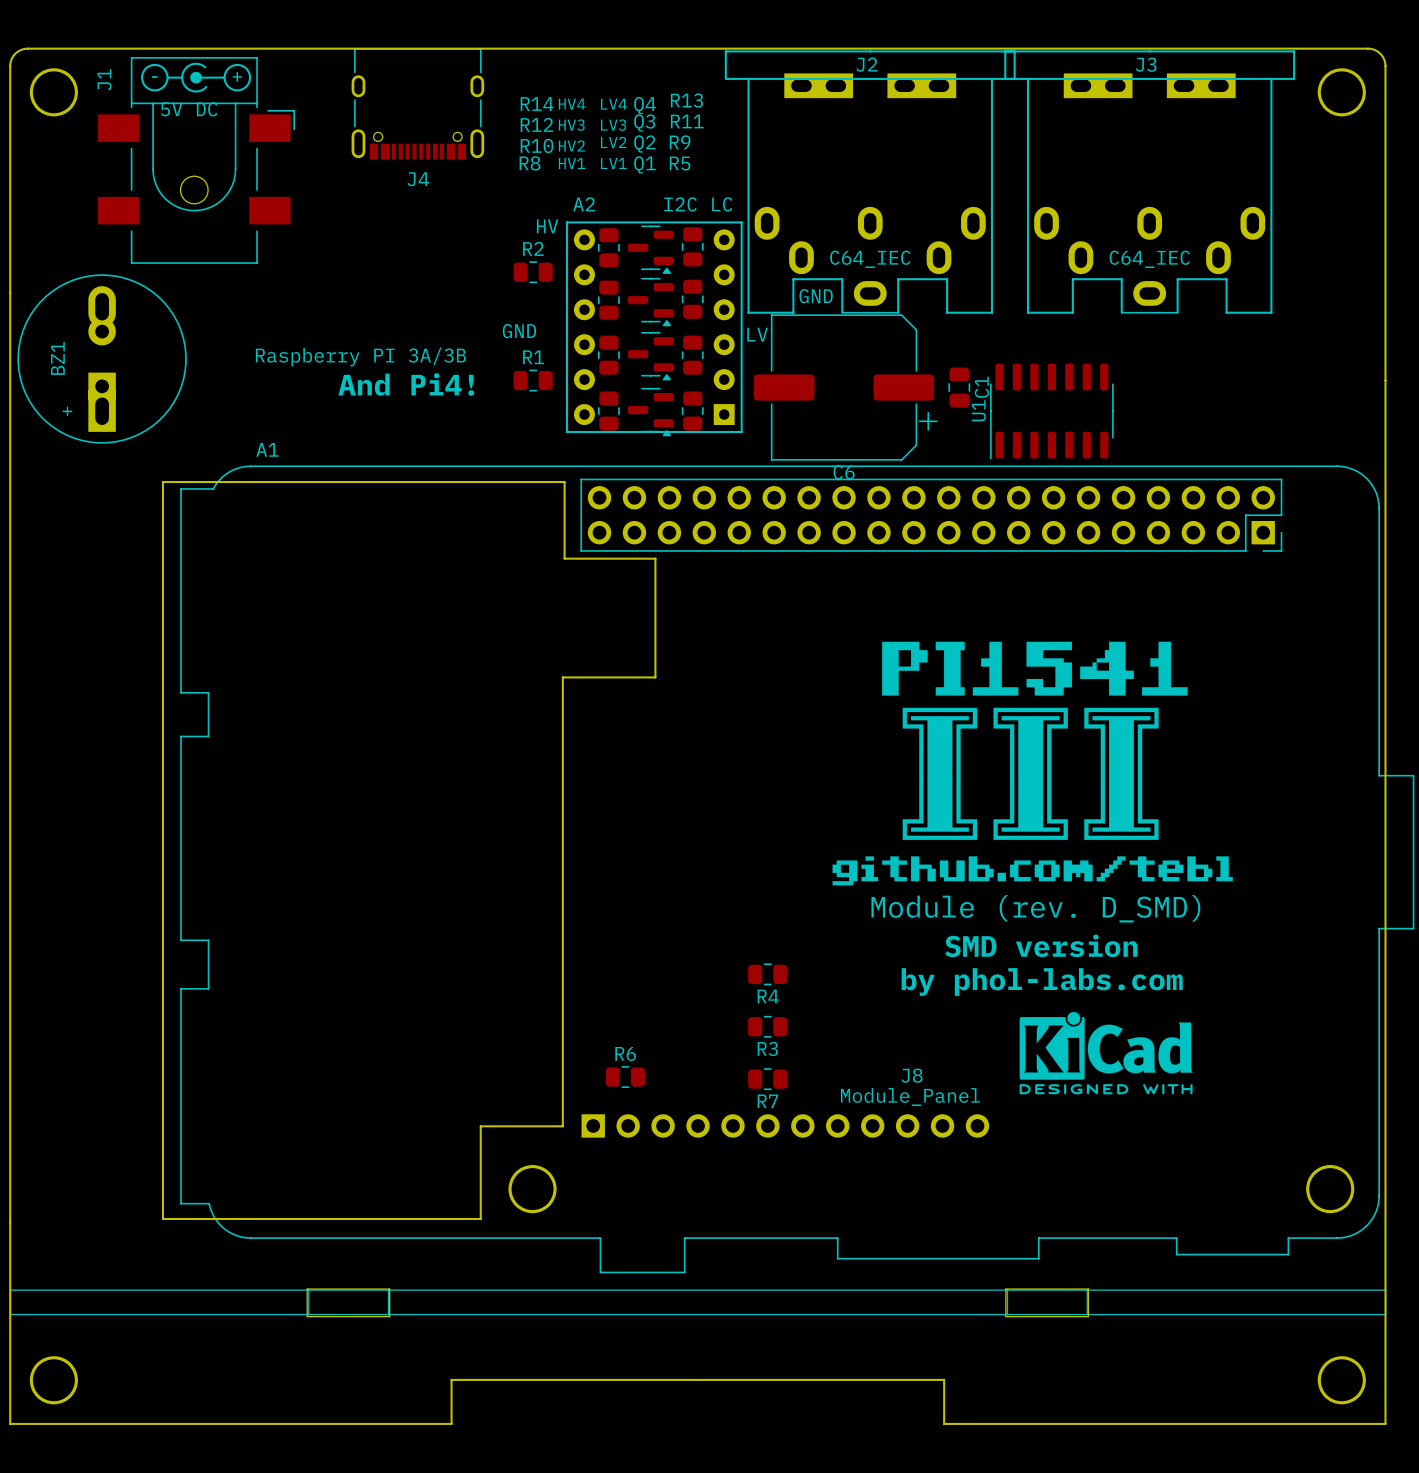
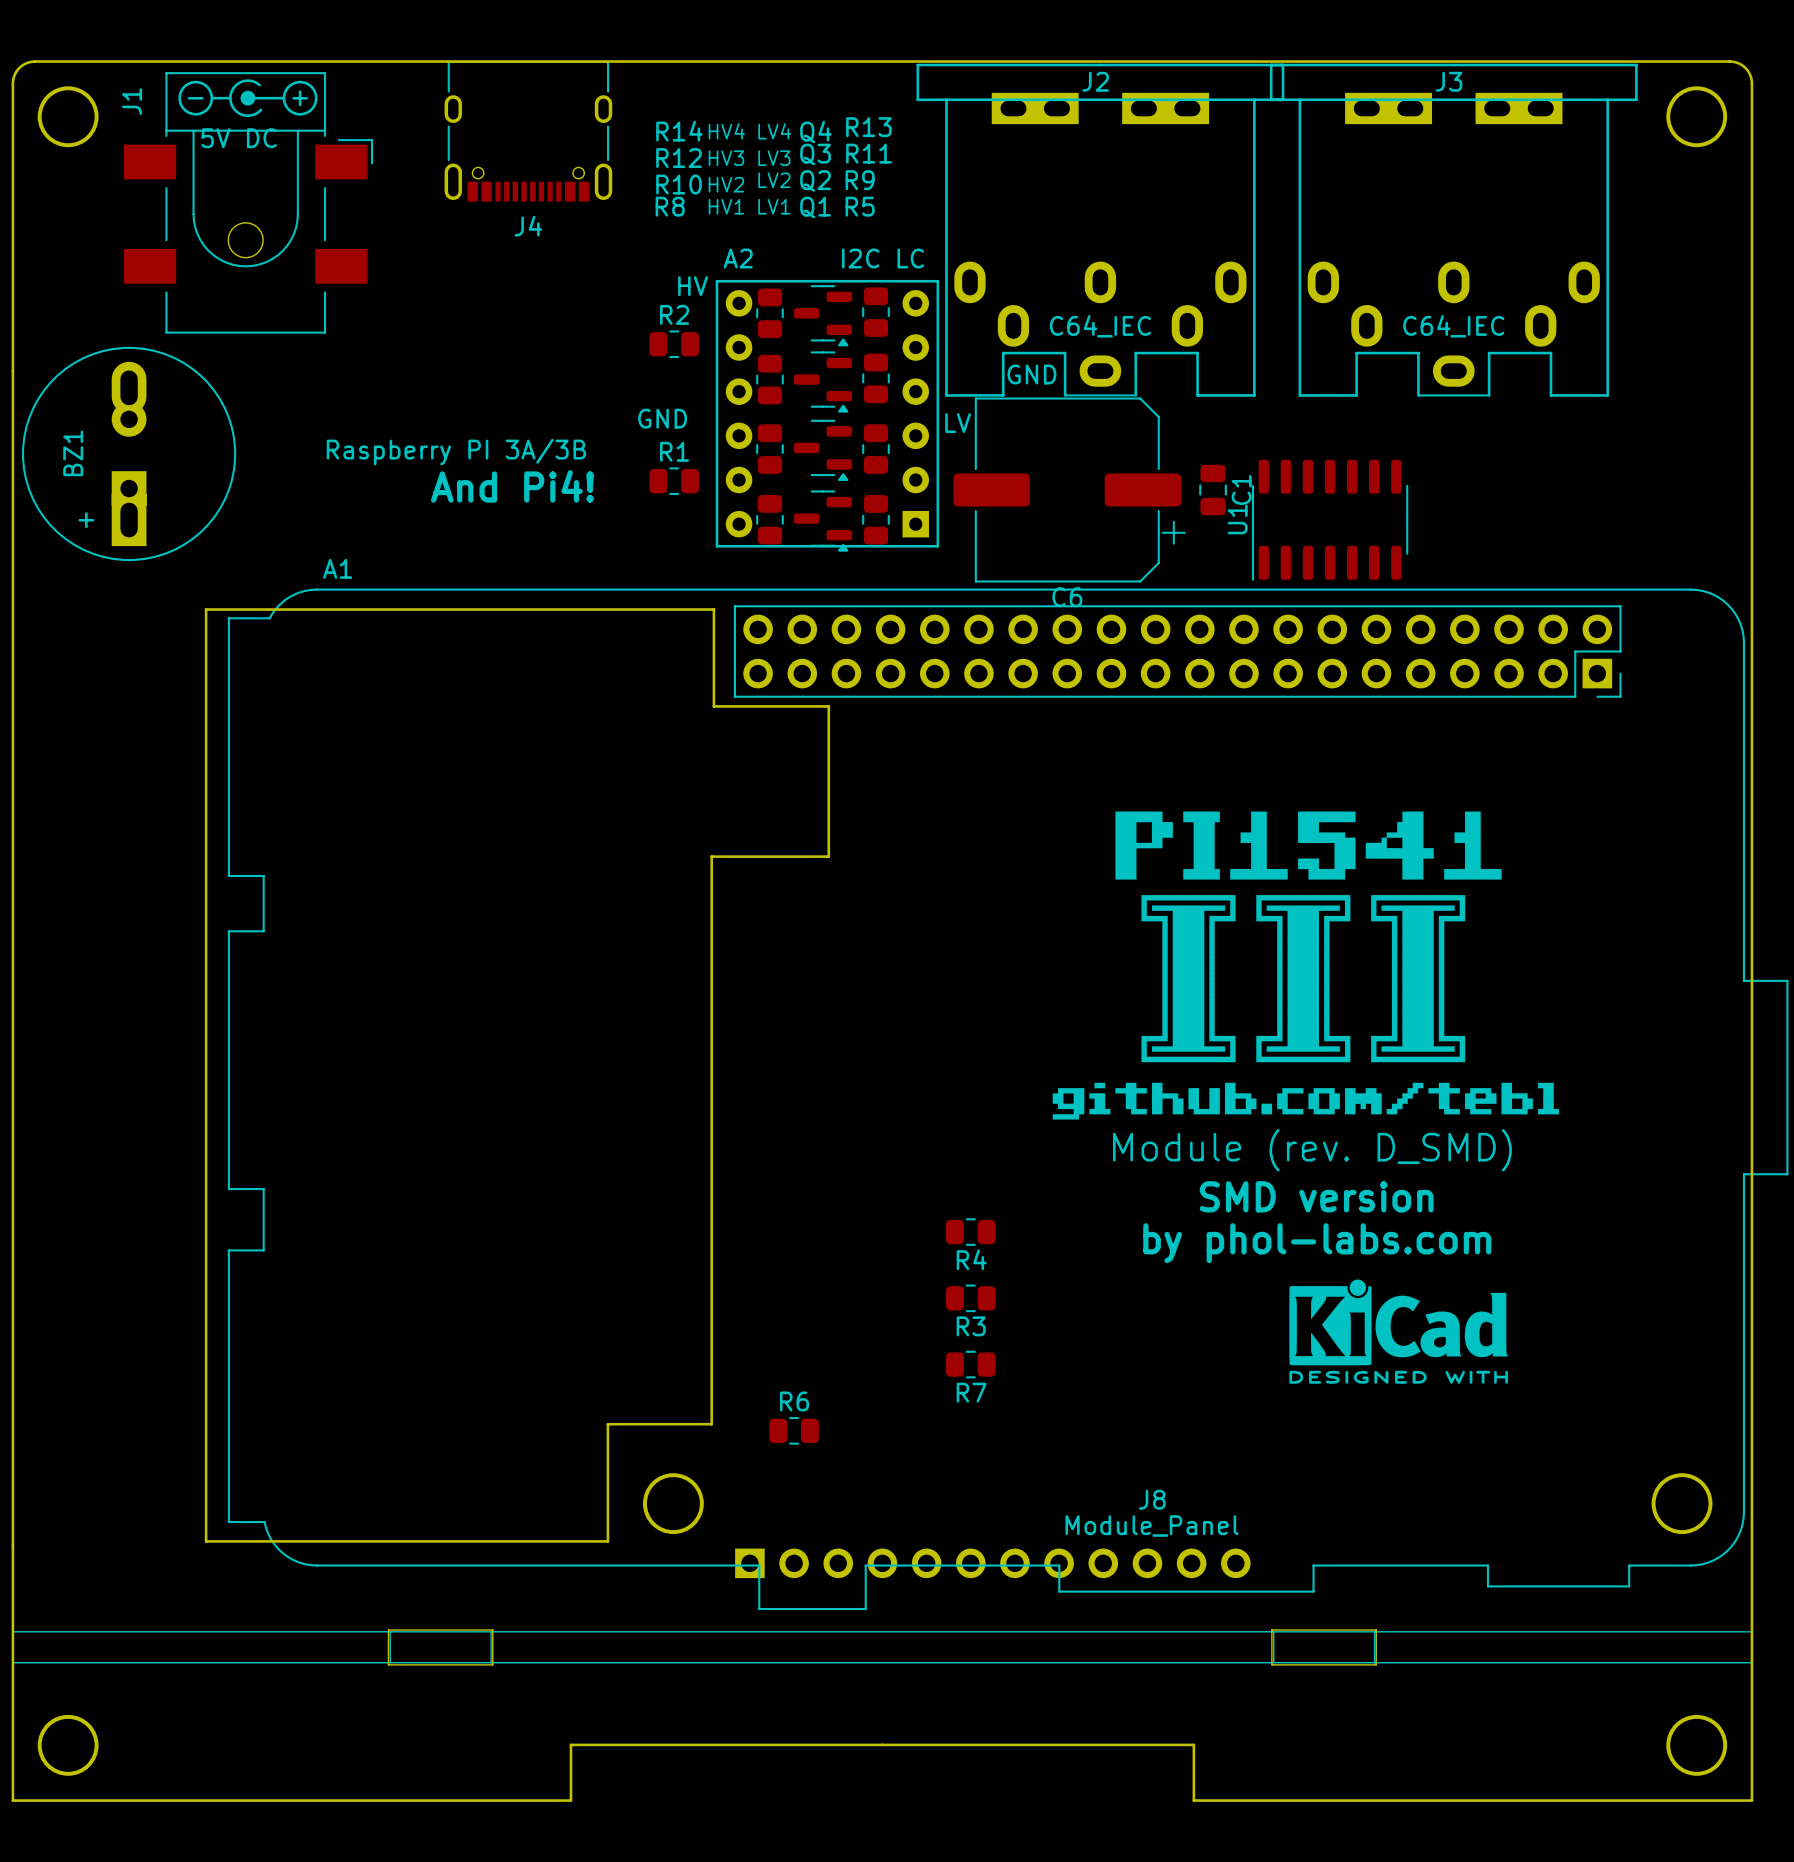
J8 name position: J8 (912, 1075) -> J8 (1152, 1499)
R6 position: (625, 1077) -> (794, 1430)
J8 value position: Module_Panel (910, 1097) -> Module_Panel (1152, 1525)
J8 footprint: [10, 1114, 1387, 1315] -> [12, 1548, 1753, 1664]

